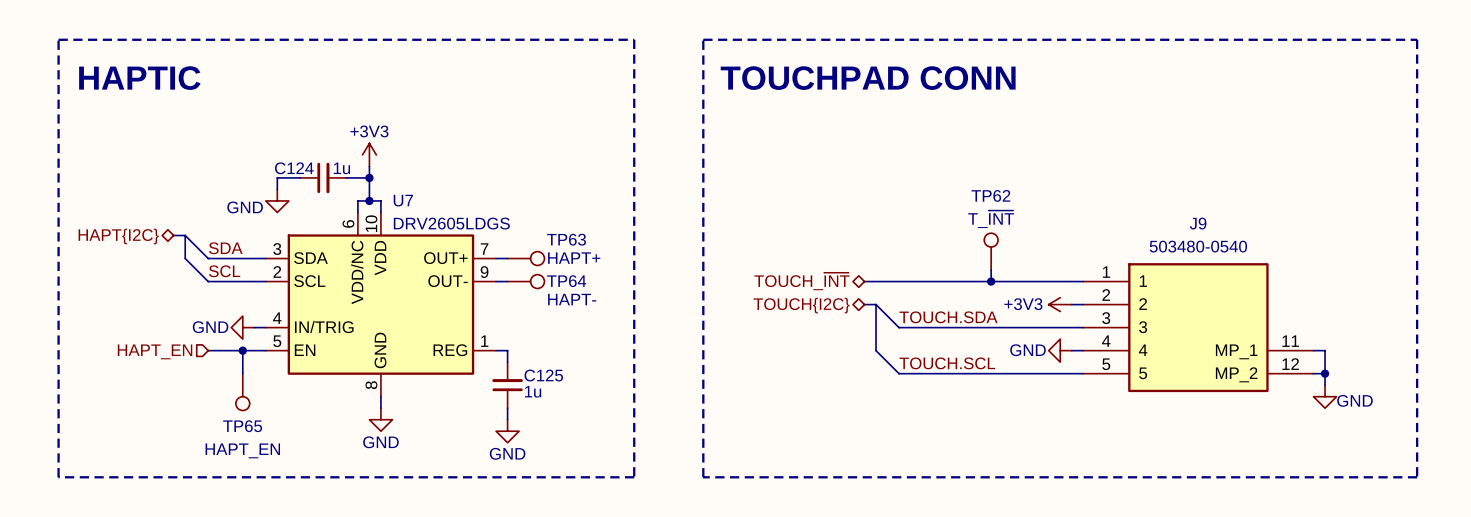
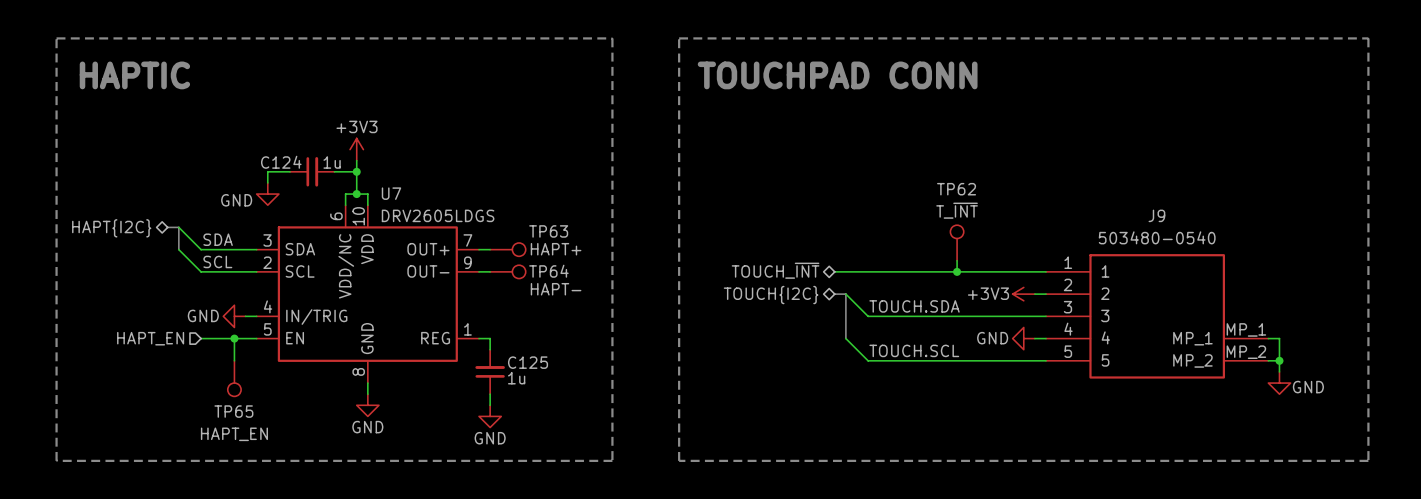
J9 pin number: 11 (1290, 341) -> MP_1 (1246, 329)
J9 pin number: 12 (1290, 364) -> MP_2 (1246, 352)

